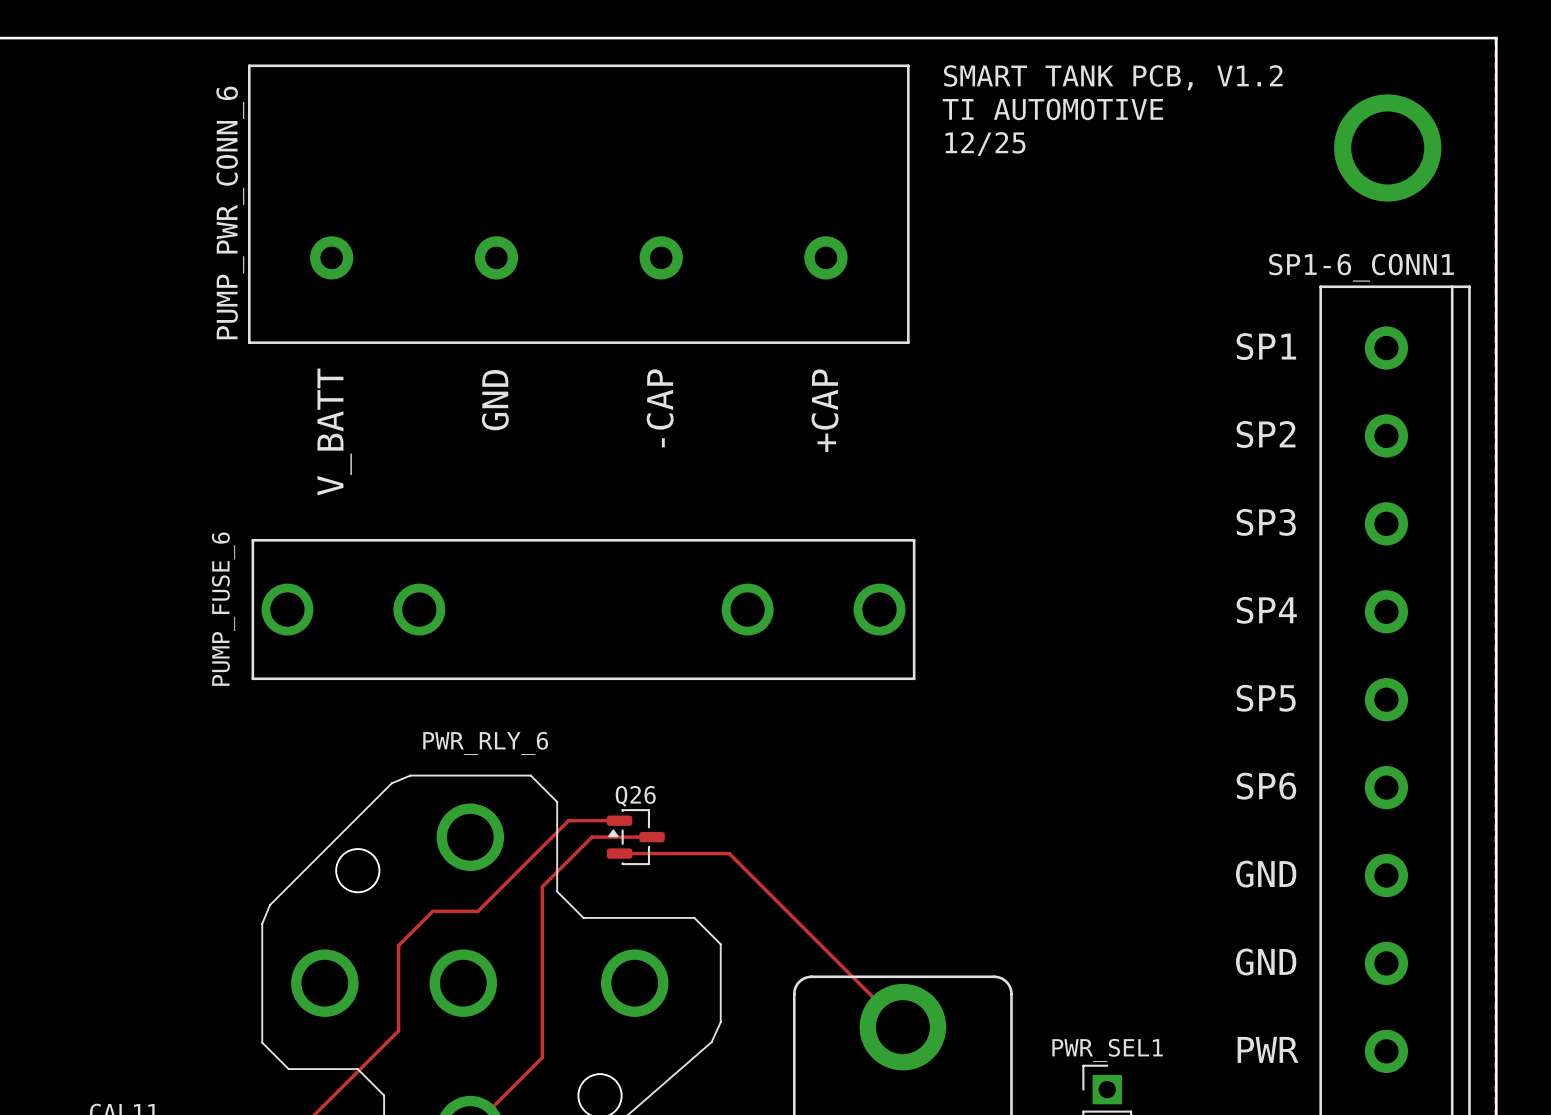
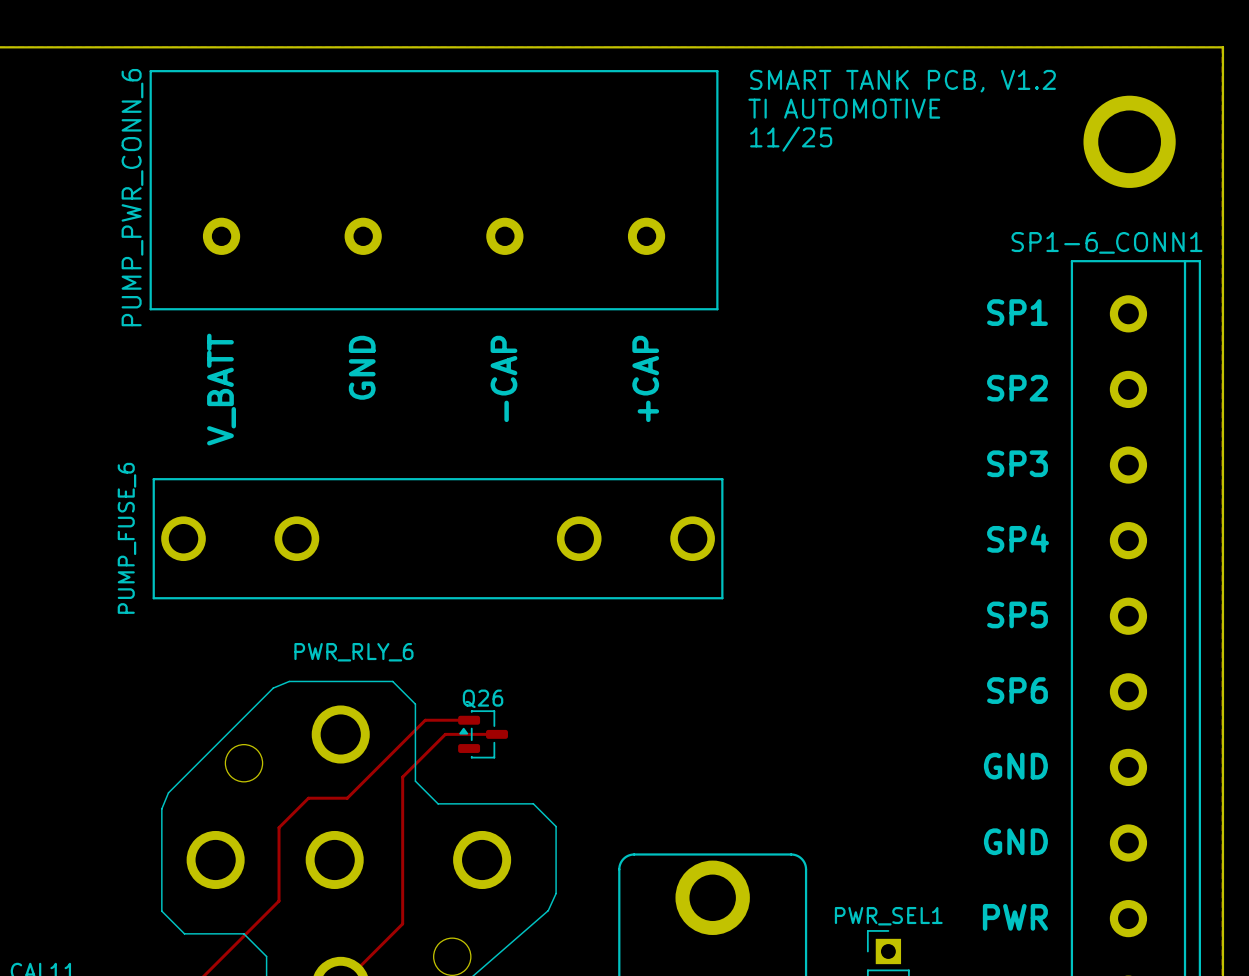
text: 12/25 (985, 143) -> 11/25 (791, 139)
top track: (619, 853) (729, 853) (902, 1027) -> none

